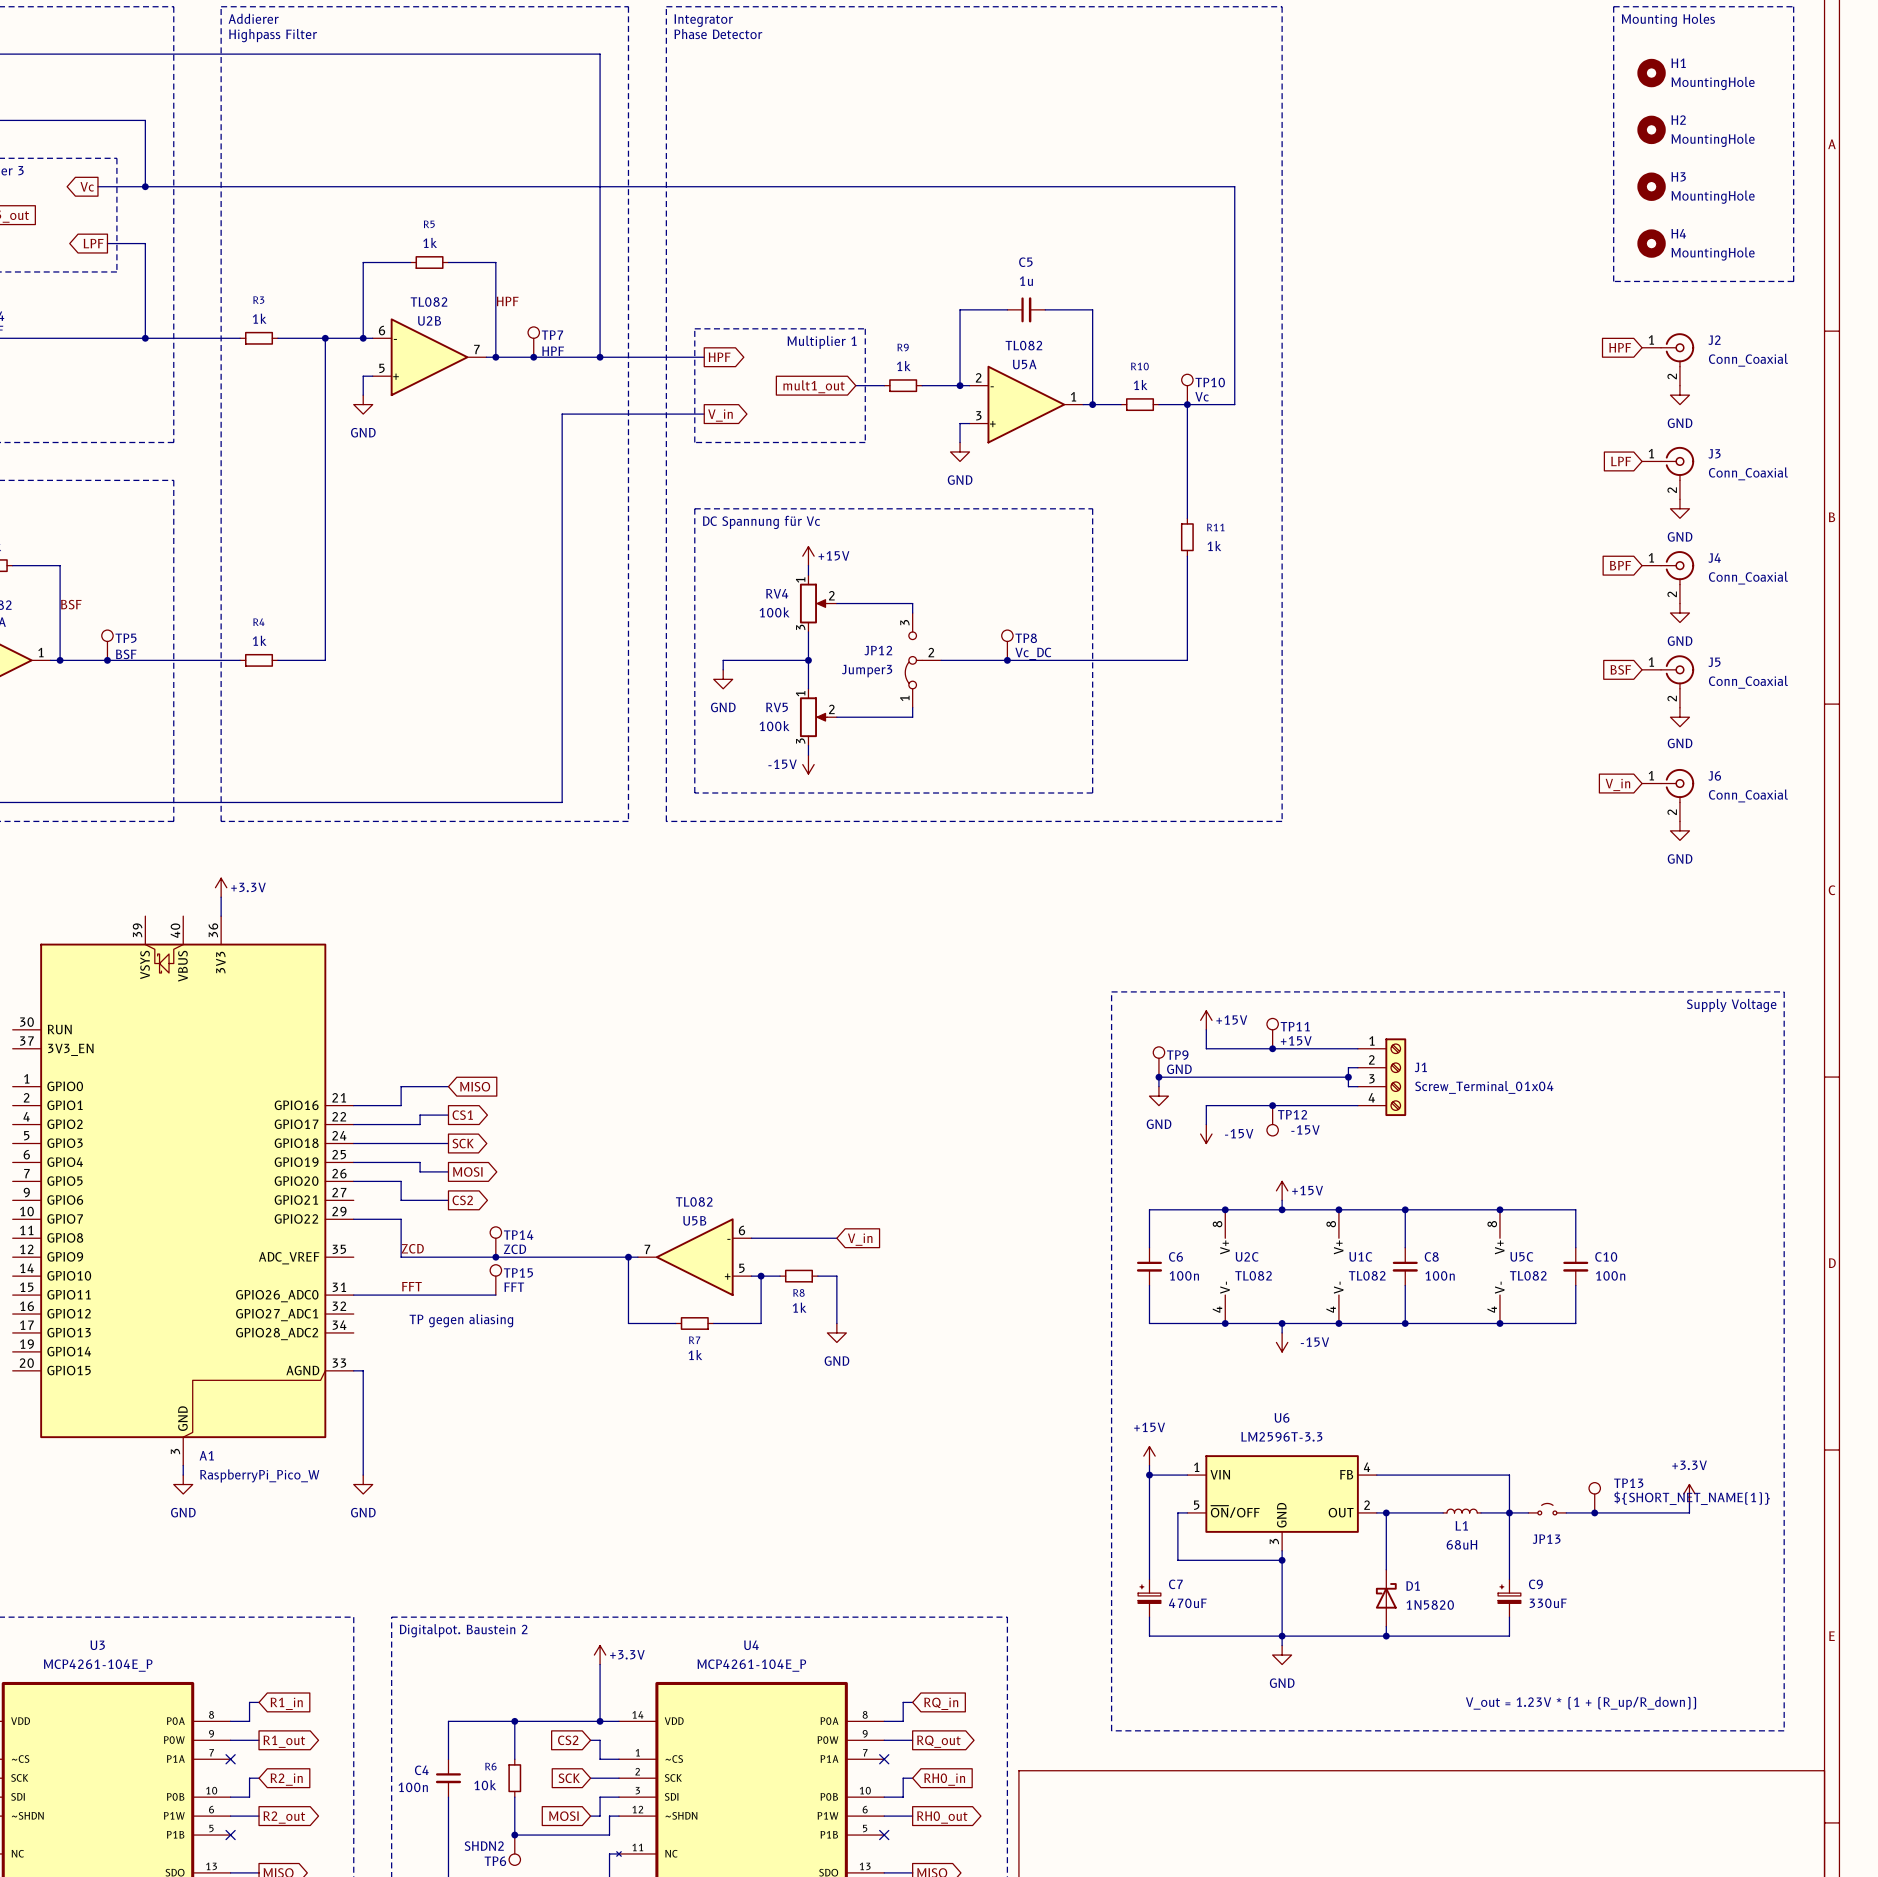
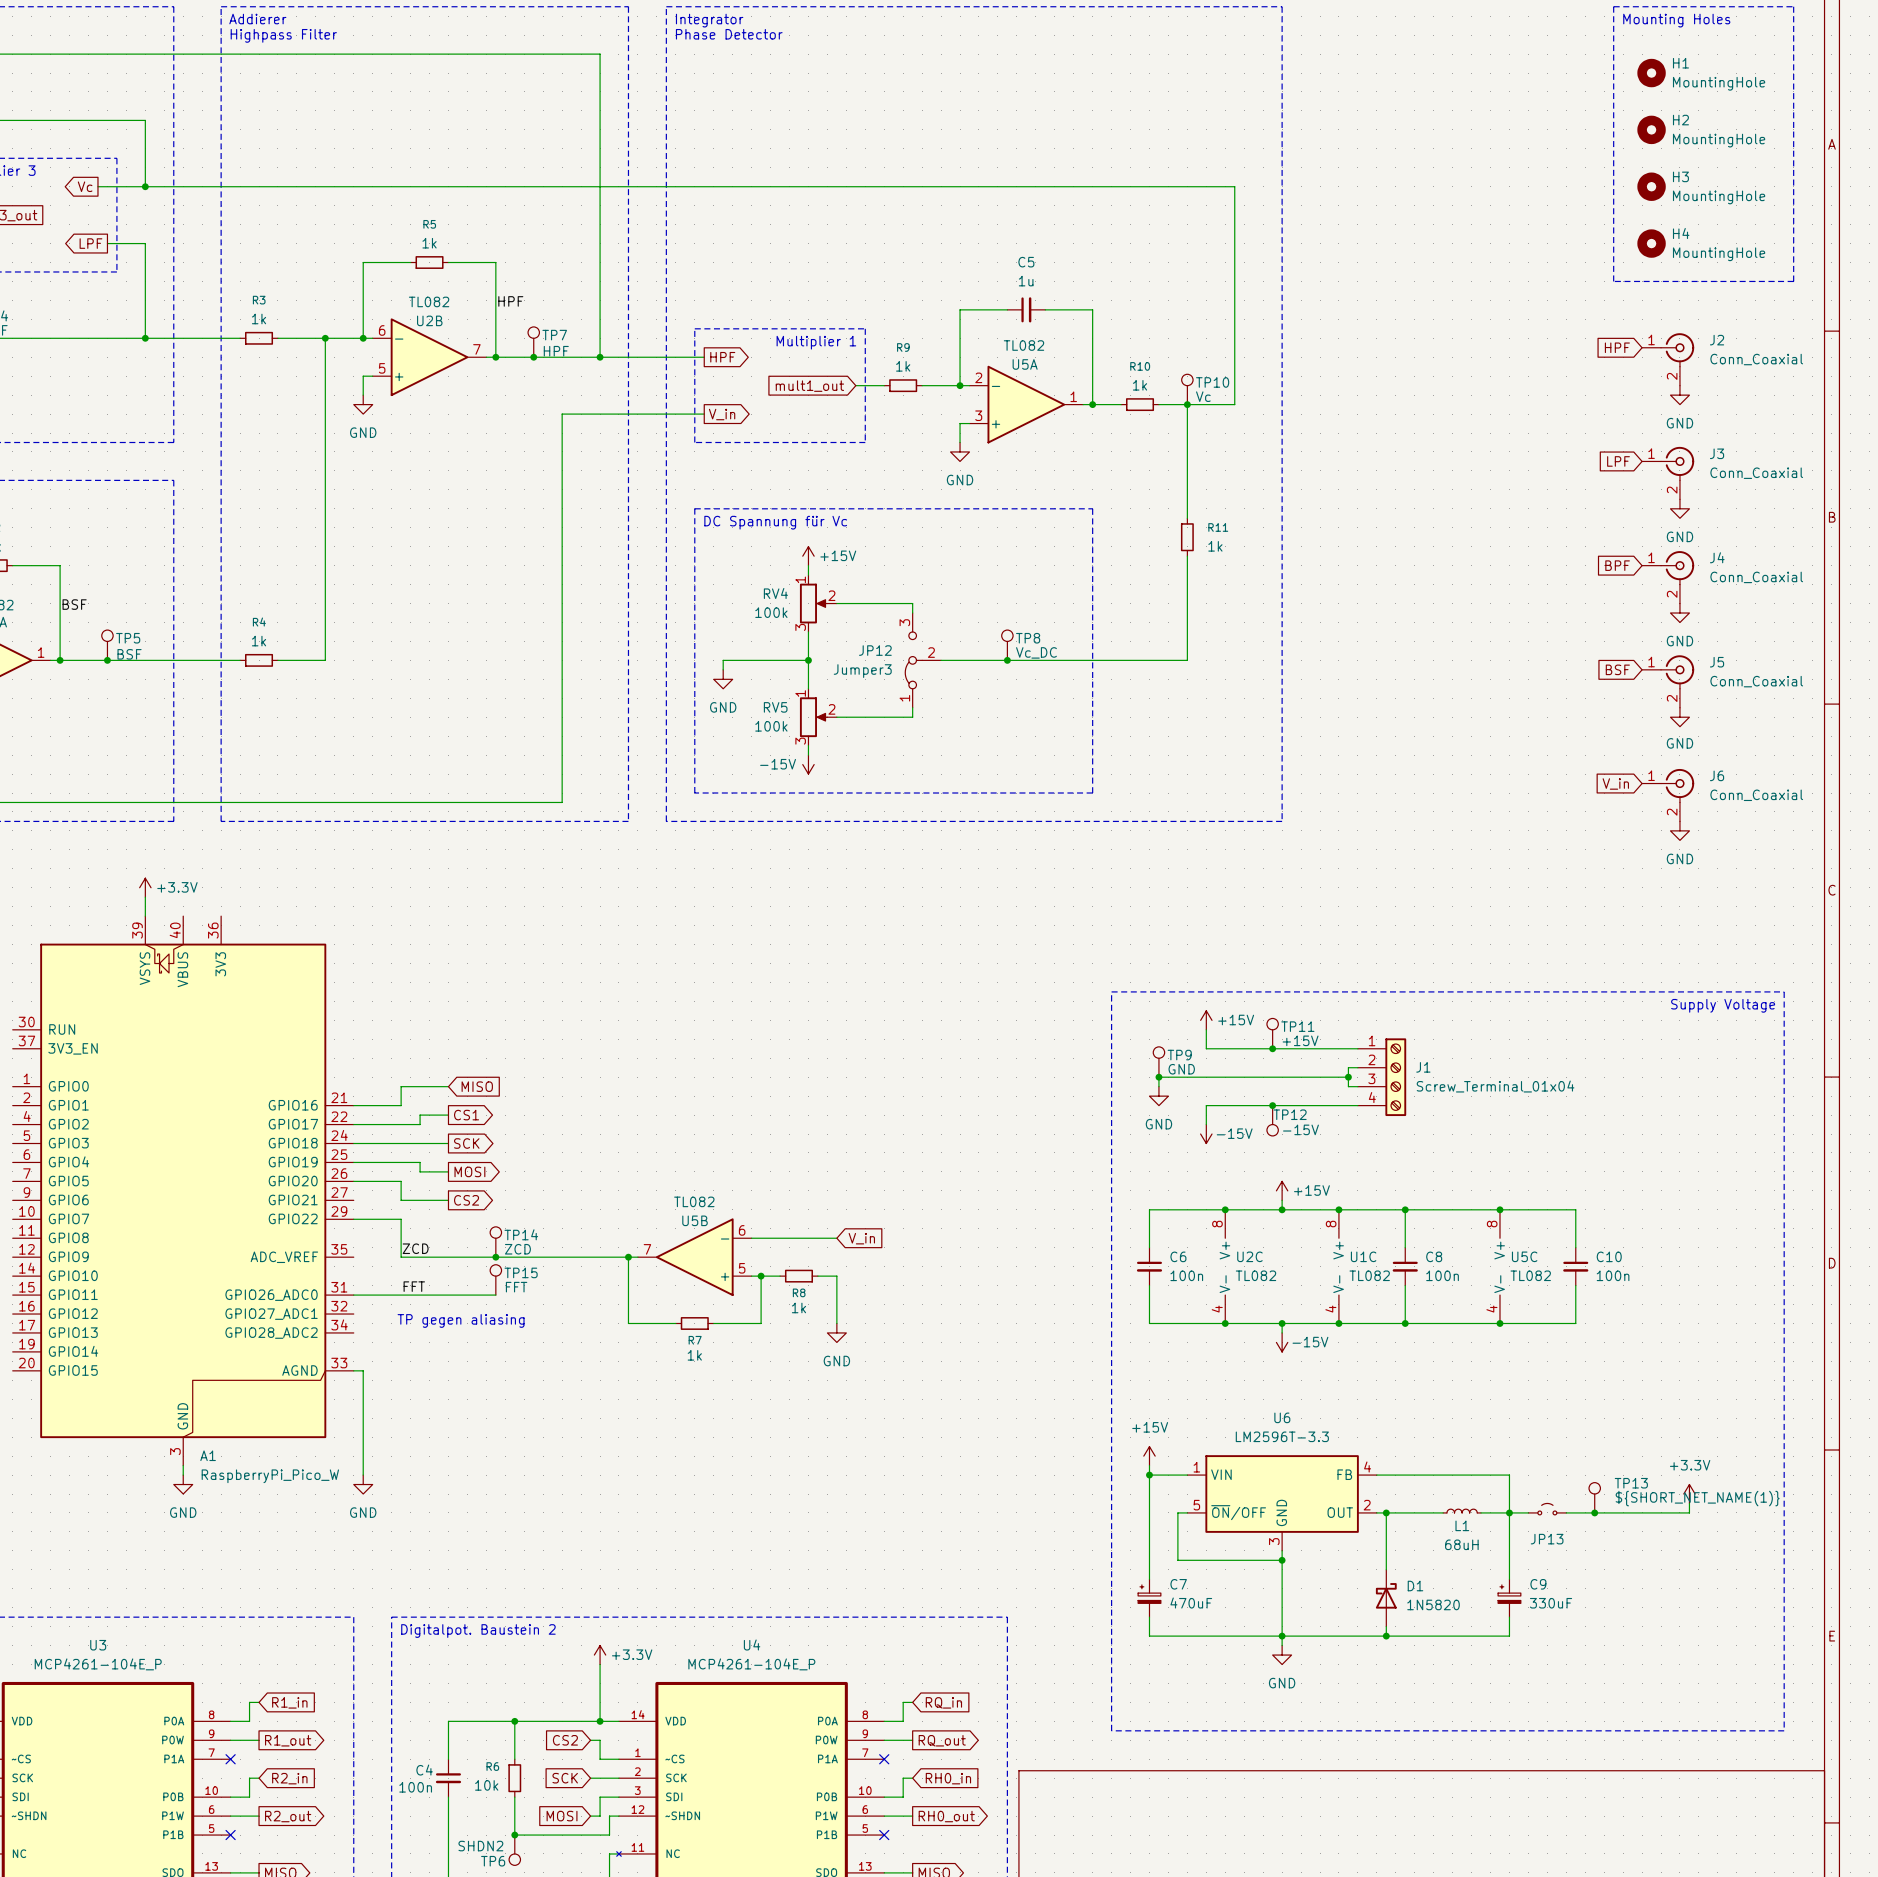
power symbol position: +3.3V (221, 887) -> +3.3V (145, 887)
wire: (221, 897) (221, 916) -> (145, 897) (145, 916)
text: V_out = 1.23V * (1 + (R_up/R_down)) (1581, 1703) -> none

